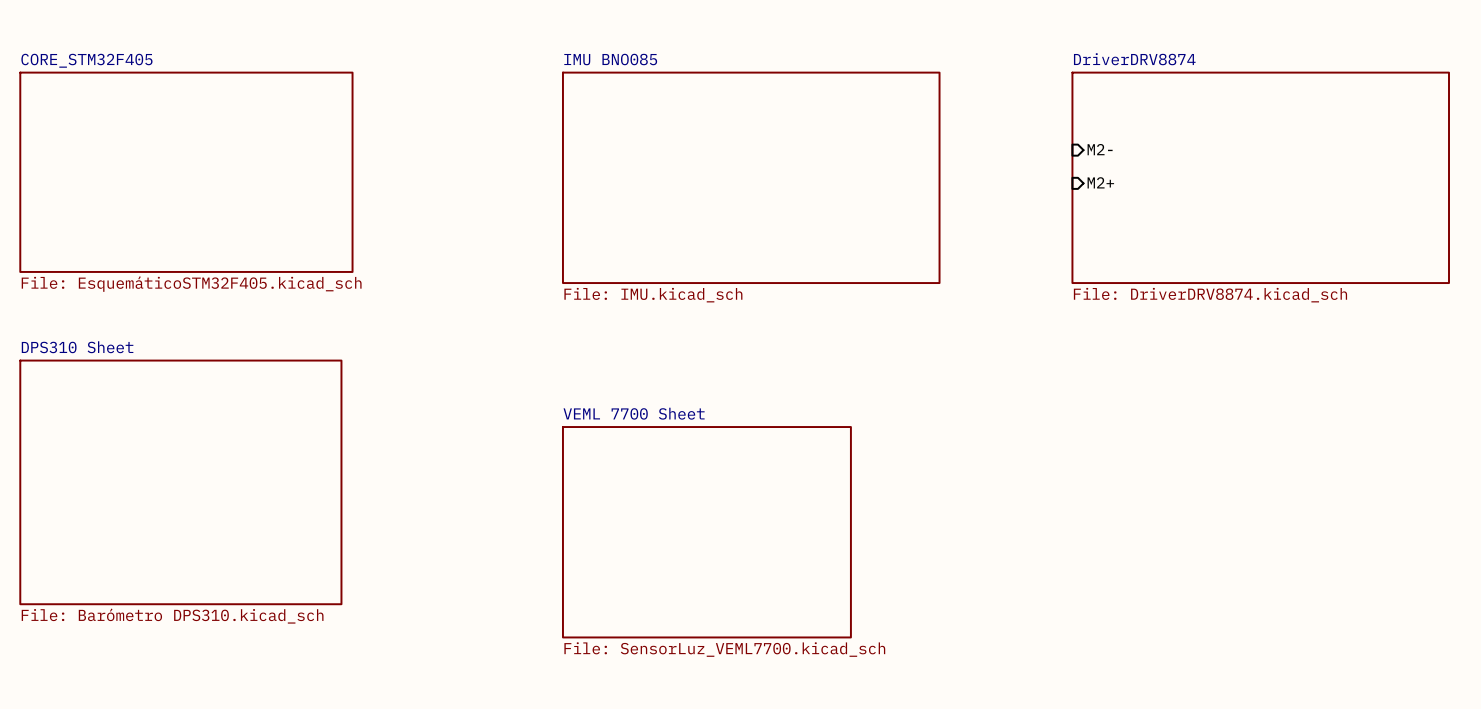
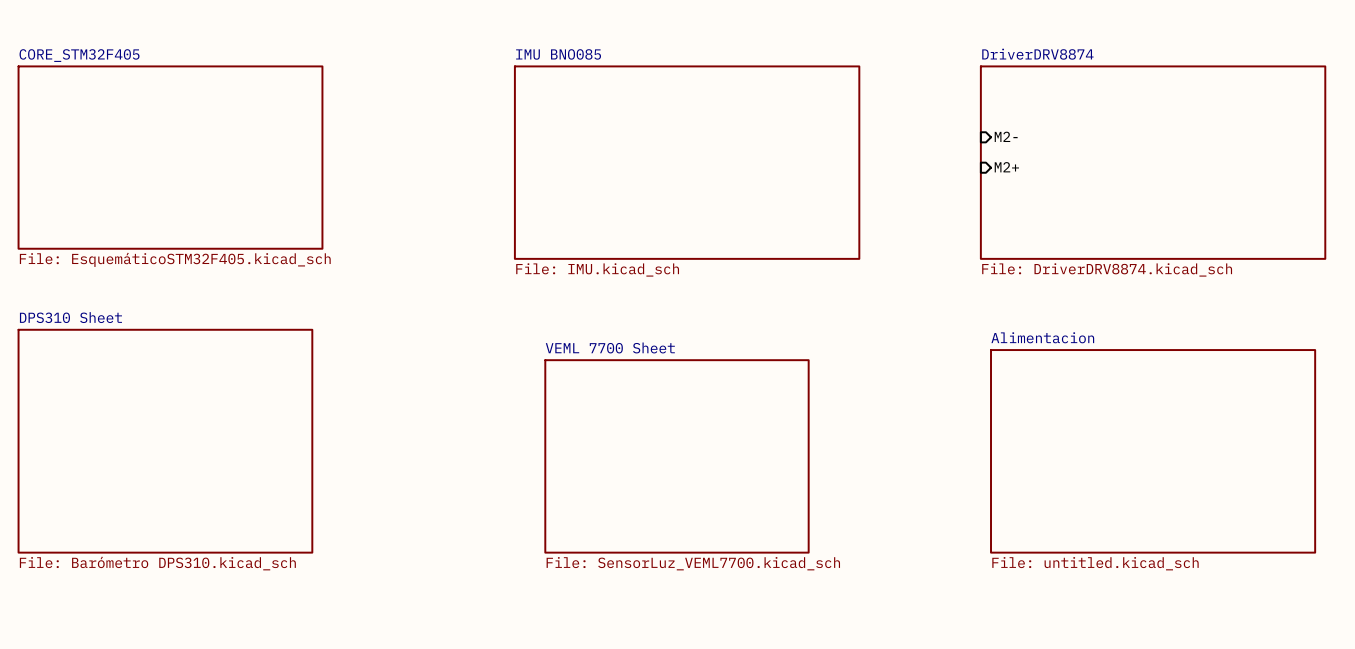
sheet Alimentacion: none -> File: untitled.kicad_sch (1153, 451)
sheet VEML 7700 Sheet position: (706, 532) -> (676, 456)

